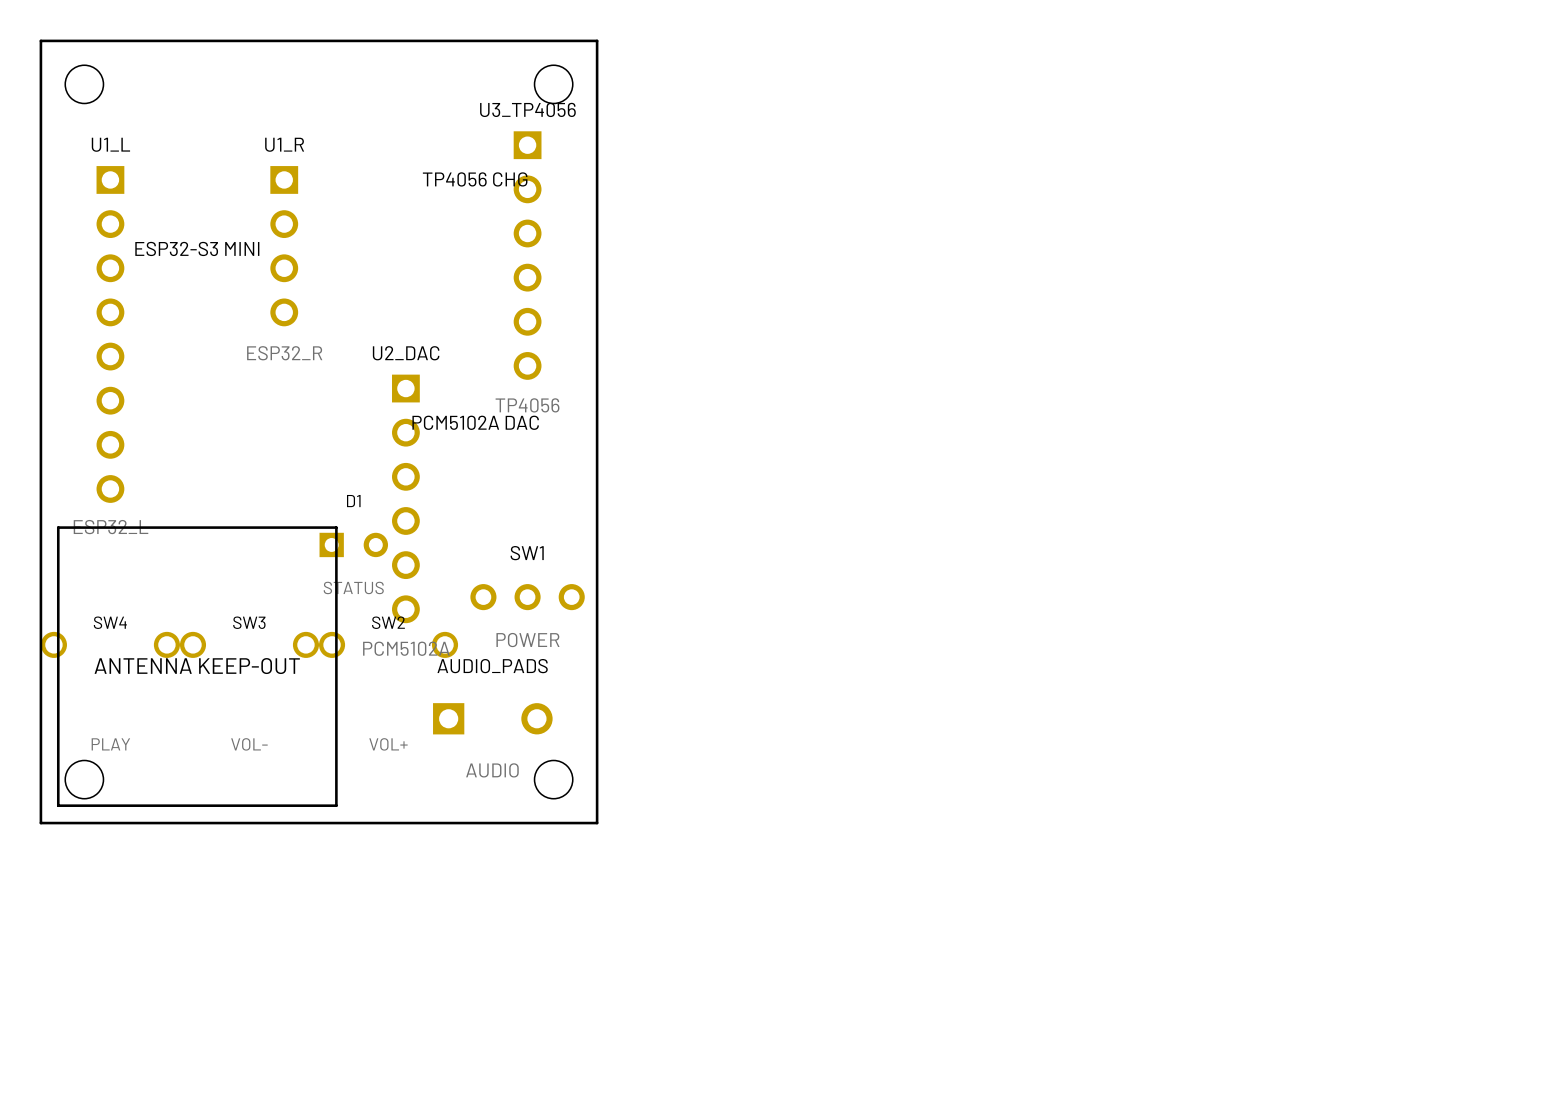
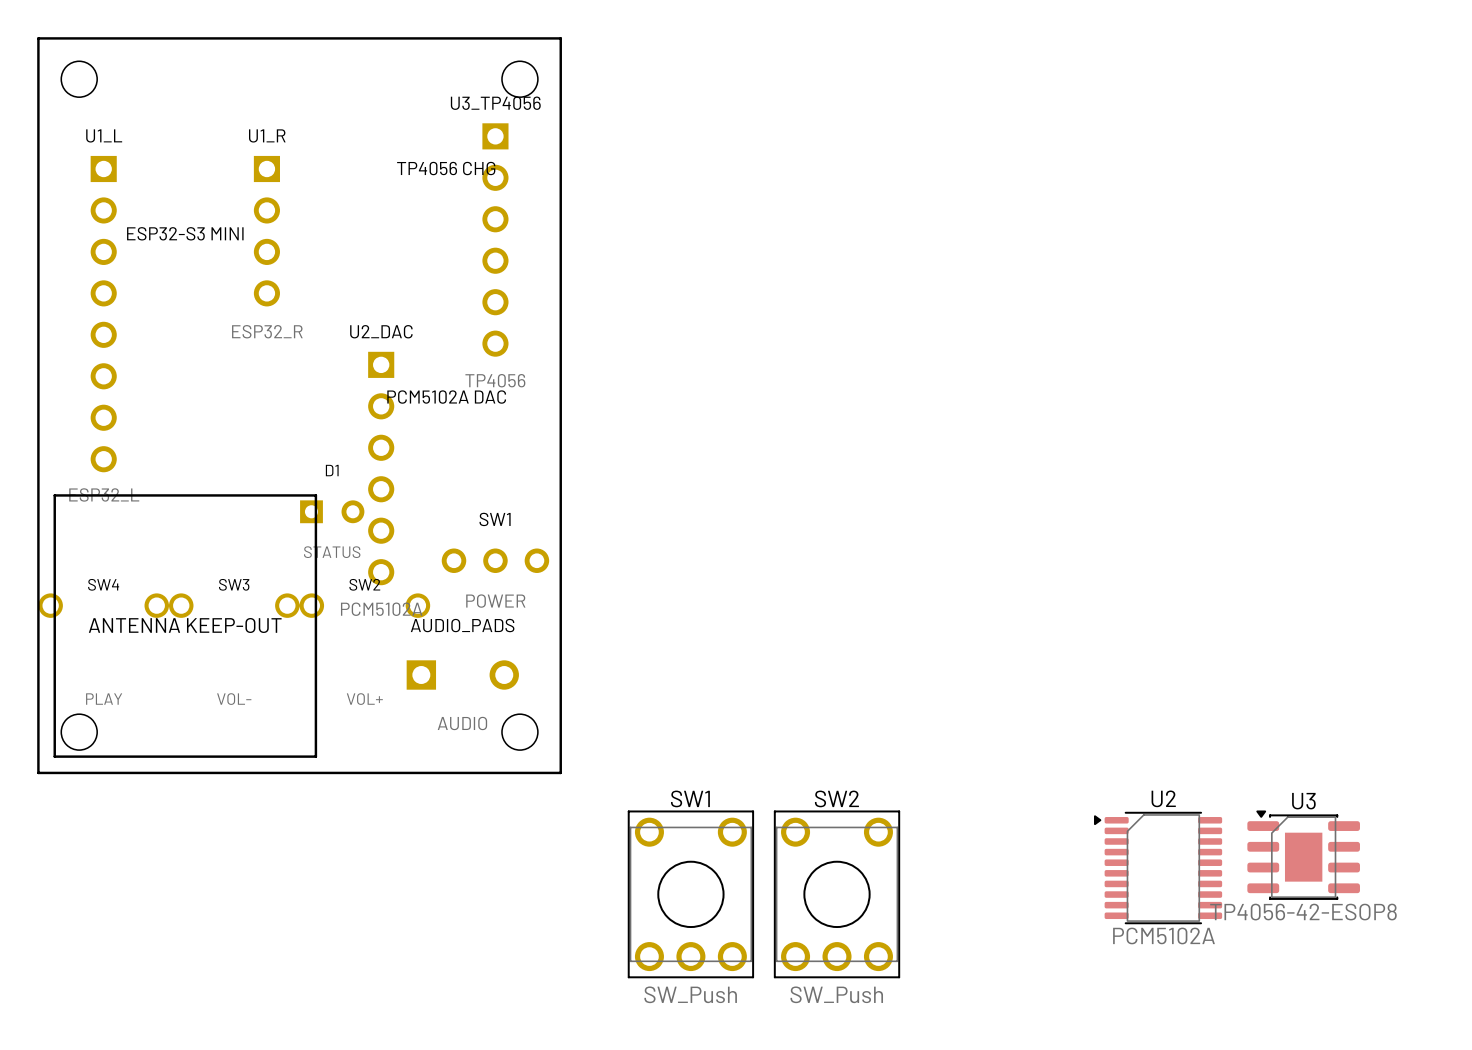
U3: none -> TP4056-42-ESOP8 (1303, 855)
U2: none -> PCM5102A (1158, 868)
SW1: none -> SW_Push (690, 894)
SW2: none -> SW_Push (837, 894)

